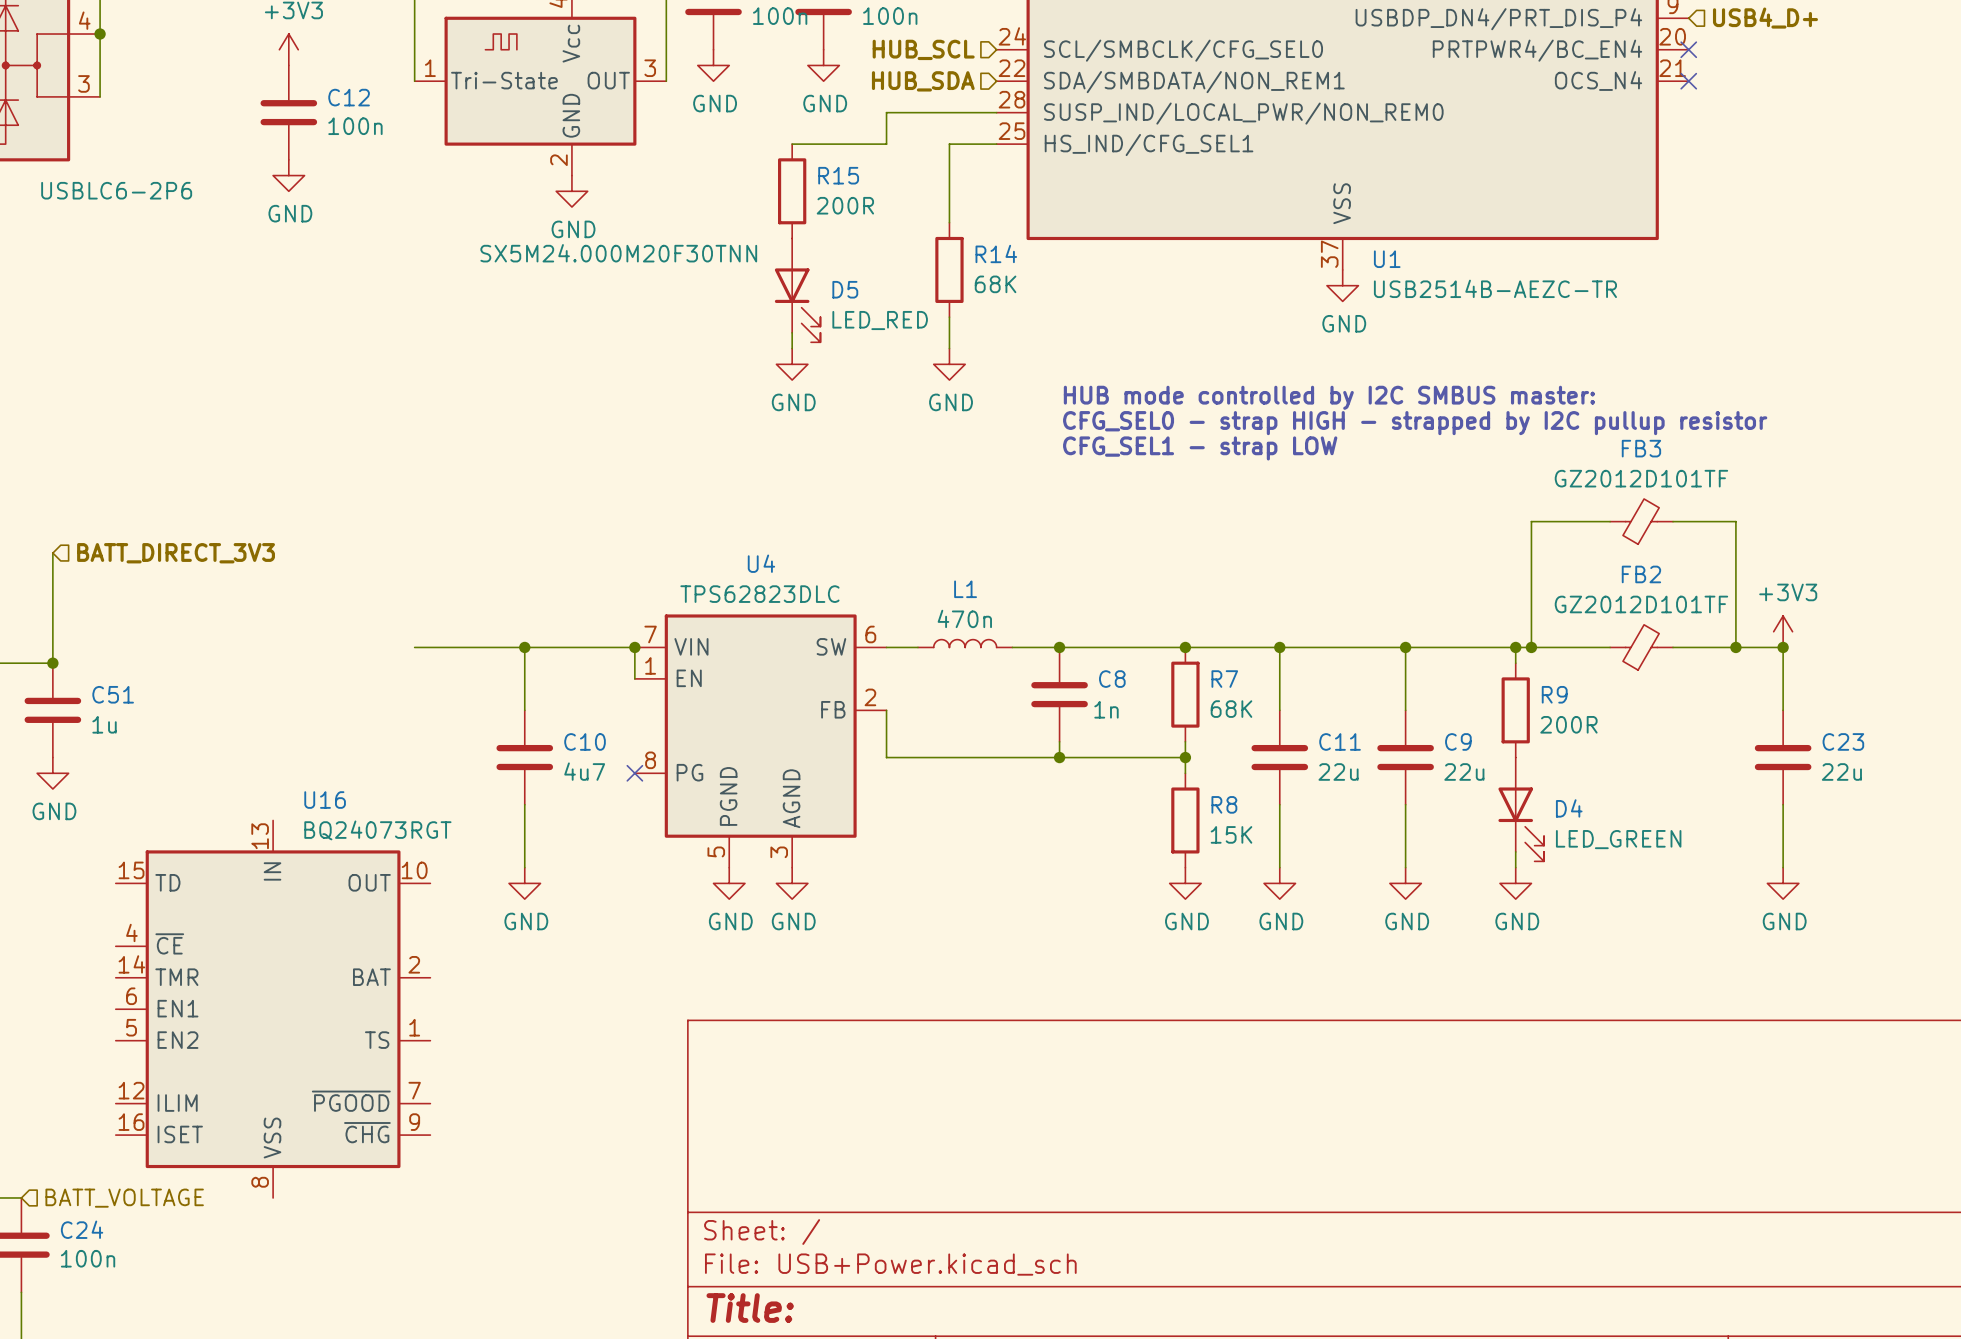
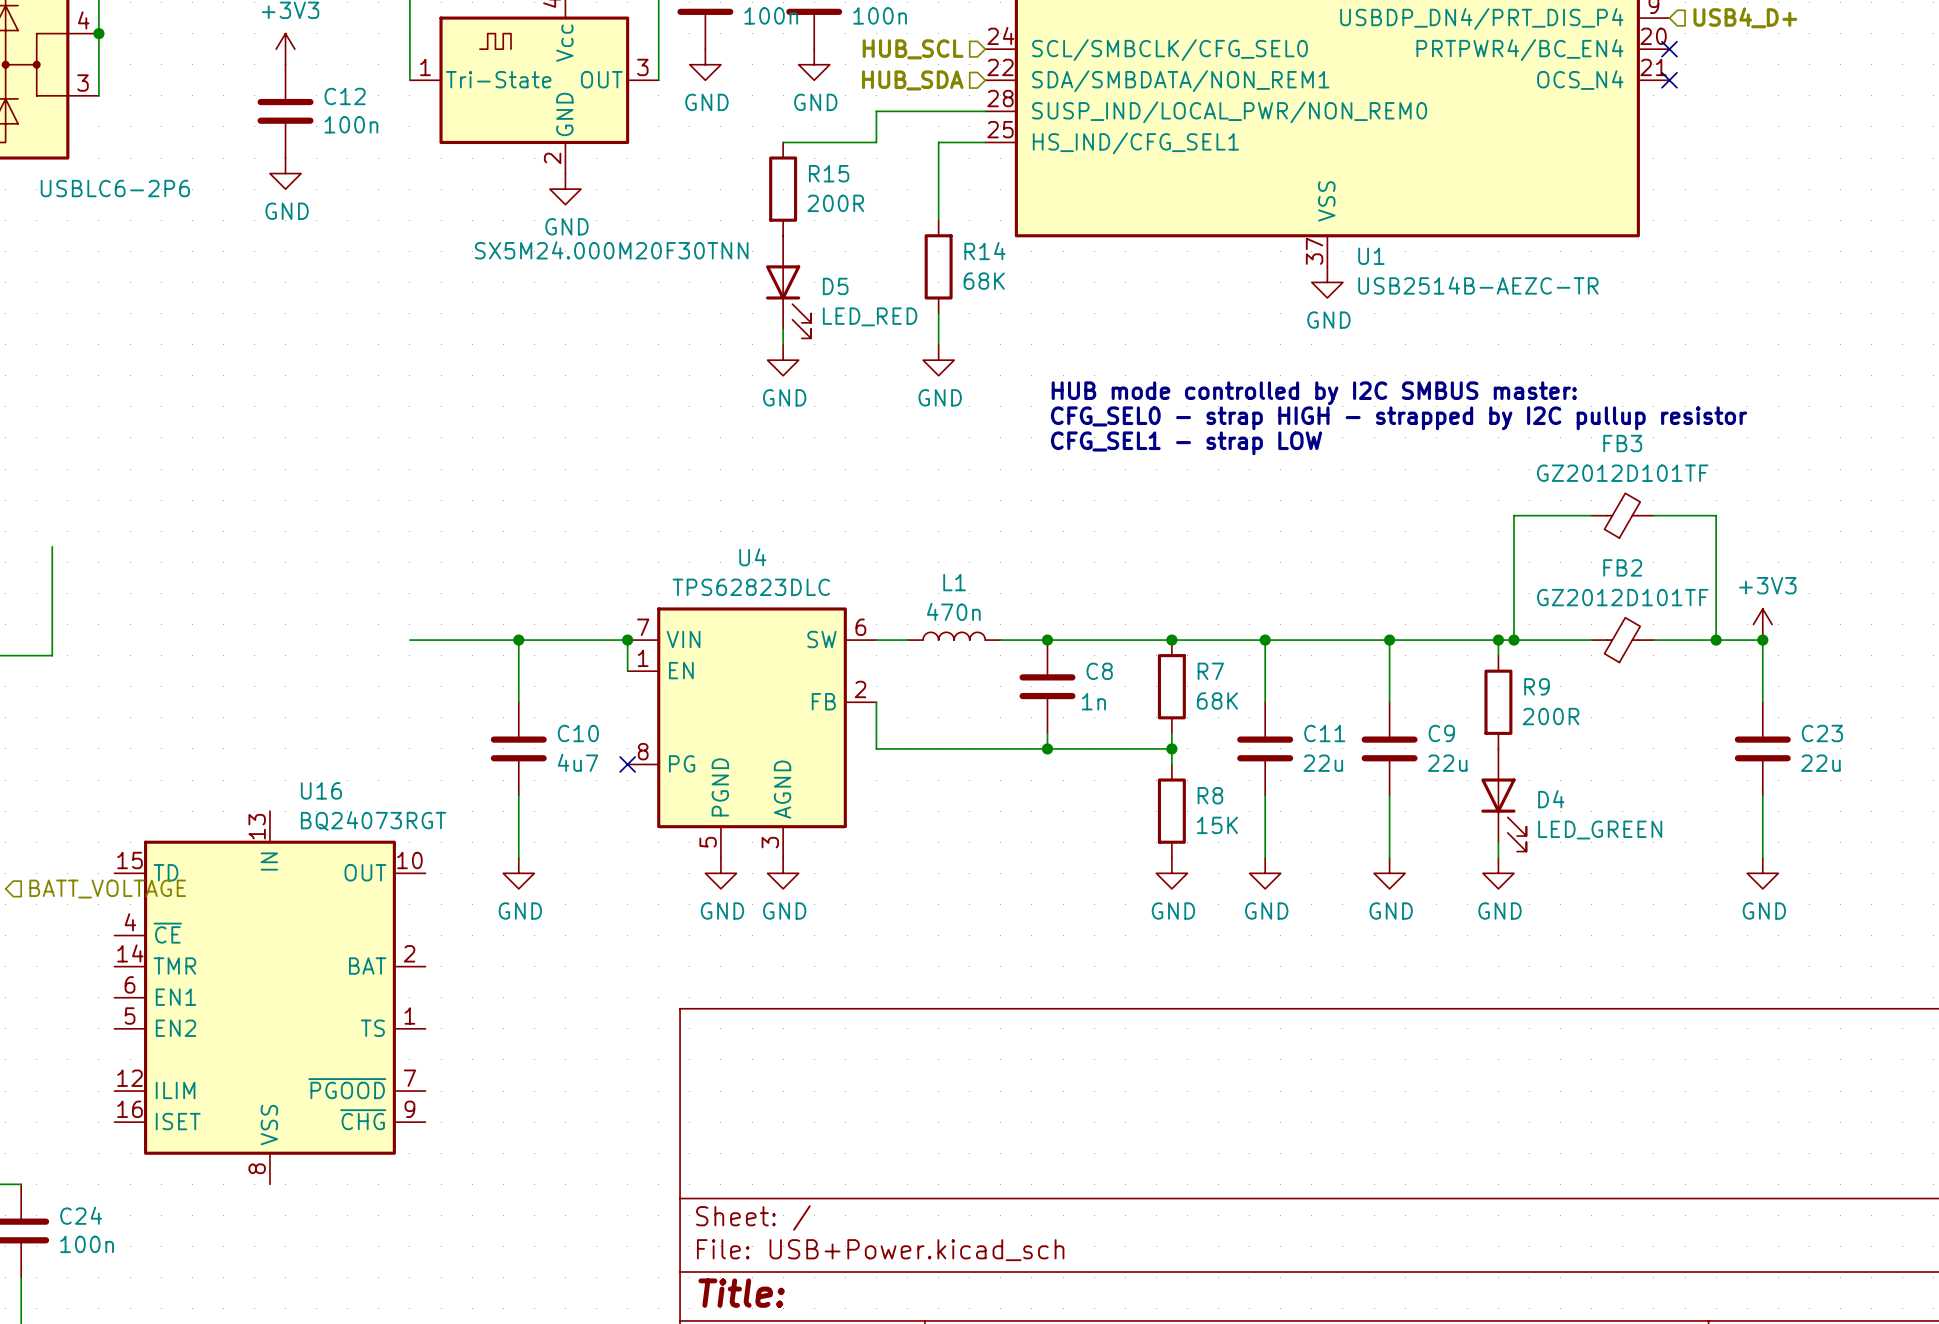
hierarchical label: BATT_DIRECT_3V3 (176, 553) -> none
junction: (52, 663) -> none
C51: 1u (52, 710) -> none
power symbol: GND (52, 773) -> none
hierarchical label position: BATT_VOLTAGE (124, 1198) -> BATT_VOLTAGE (107, 889)

